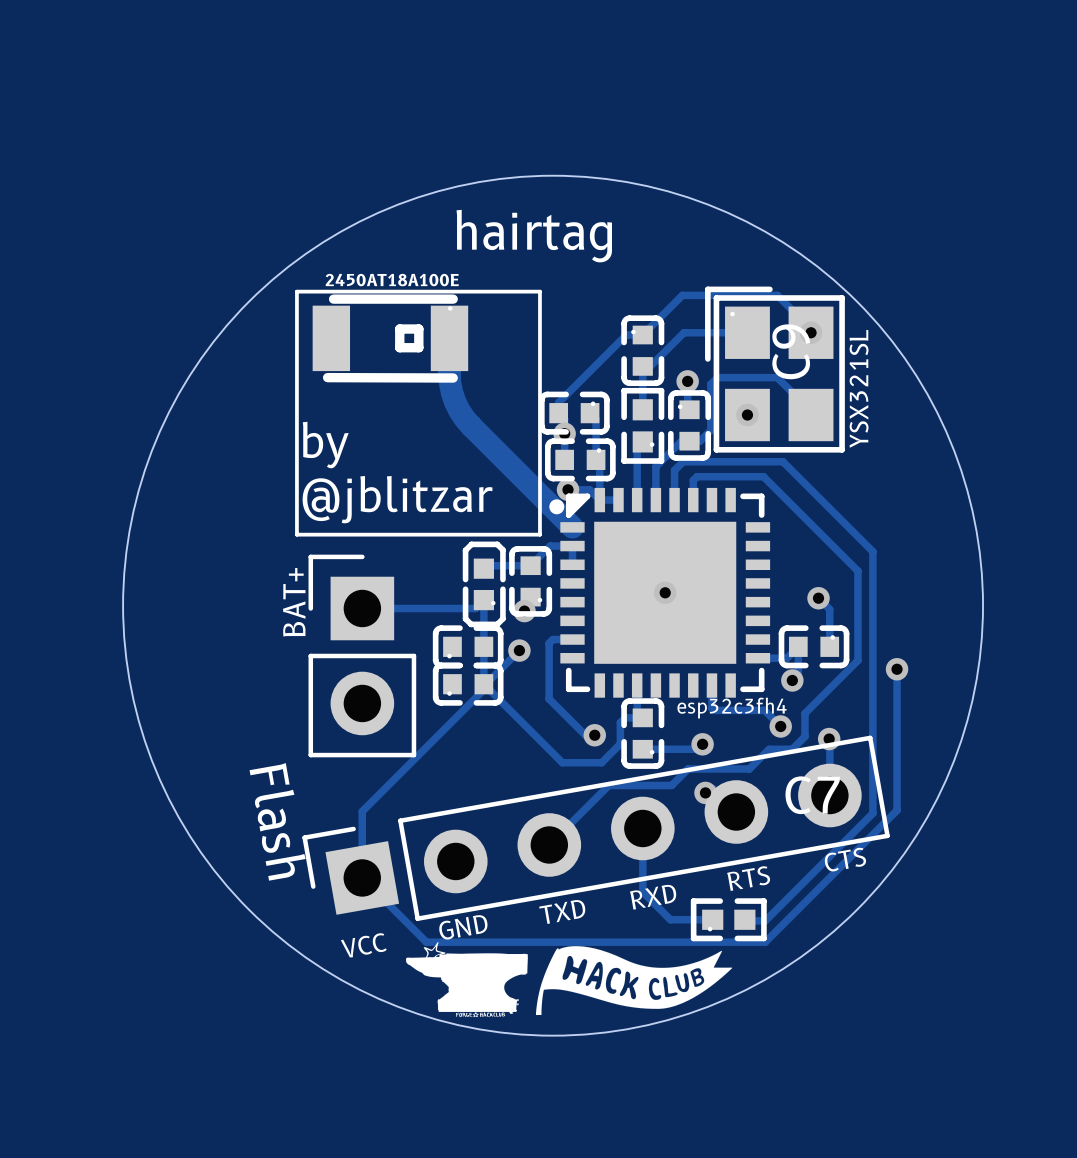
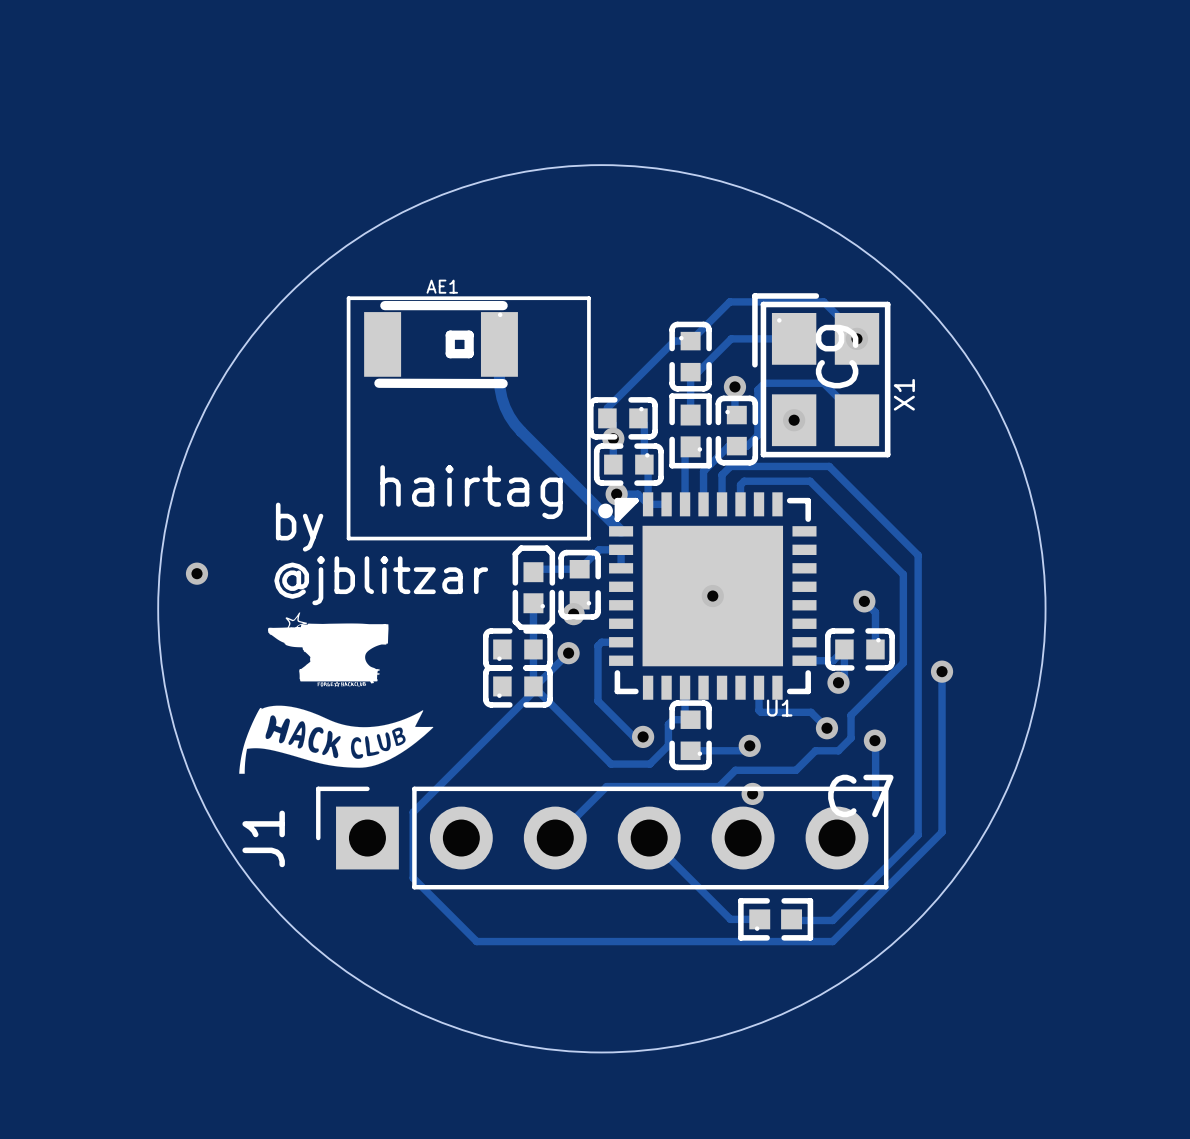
round board edge size: [122, 174, 984, 1037] -> [157, 164, 1047, 1054]
text position: hairtag (534, 236) -> hairtag (471, 492)
2450AT18A100E name: 2450AT18A100E (392, 280) -> AE1 (442, 286)
track width: thick (449, 338) (450, 383) (459, 410) (471, 426) (572, 527) -> thin (499, 344) (500, 388) (509, 416) (521, 431) (621, 531)
YSX321SL name: YSX321SL (859, 388) -> X1 (904, 394)
text position: by (325, 445) -> by (299, 527)
text position: @jblitzar (397, 499) -> @jblitzar (381, 580)
via: none -> (197, 573)
track: (483, 600) (475, 608) (362, 608) -> none
BAT+: (362, 655) -> none
drawing: none -> [320, 681, 367, 687]
esp32c3fh4 name: esp32c3fh4 (732, 708) -> U1 (779, 708)
track: (608, 785) (549, 844) -> (656, 786) (606, 786) (555, 838)
track: (897, 810) (872, 834) -> (918, 814) (918, 835)
track: none -> (942, 811) (942, 832) (832, 941) (811, 941)
track: (872, 813) (765, 920) -> none
Flash: (596, 828) -> none
track: (642, 828) (642, 892) (670, 919) (683, 919) -> (649, 838) (730, 919)
J1: none -> (602, 838)
text: CTS (845, 859) -> none
text: RTS (748, 878) -> none
text: RXD (653, 897) -> none
text: TXD (562, 911) -> none
track: (786, 920) (765, 942) -> (832, 920) (811, 920)
text: GND (463, 927) -> none
text: VCC (363, 945) -> none
drawing position: (596, 972) -> (299, 731)
drawing position: (695, 974) -> (397, 733)
drawing position: (637, 977) -> (339, 736)
drawing position: (466, 978) -> (328, 647)
drawing position: (547, 981) -> (250, 740)
drawing position: (698, 981) -> (400, 740)
drawing: [459, 1012, 506, 1018] -> none
drawing position: (457, 1014) -> (318, 684)
drawing position: (464, 1014) -> (325, 684)
drawing position: (467, 1014) -> (328, 684)
drawing position: (470, 1014) -> (332, 684)
drawing position: (475, 1014) -> (337, 684)
drawing position: (481, 1014) -> (342, 684)
drawing position: (484, 1014) -> (346, 684)
drawing position: (491, 1014) -> (352, 684)
drawing position: (497, 1014) -> (358, 684)

